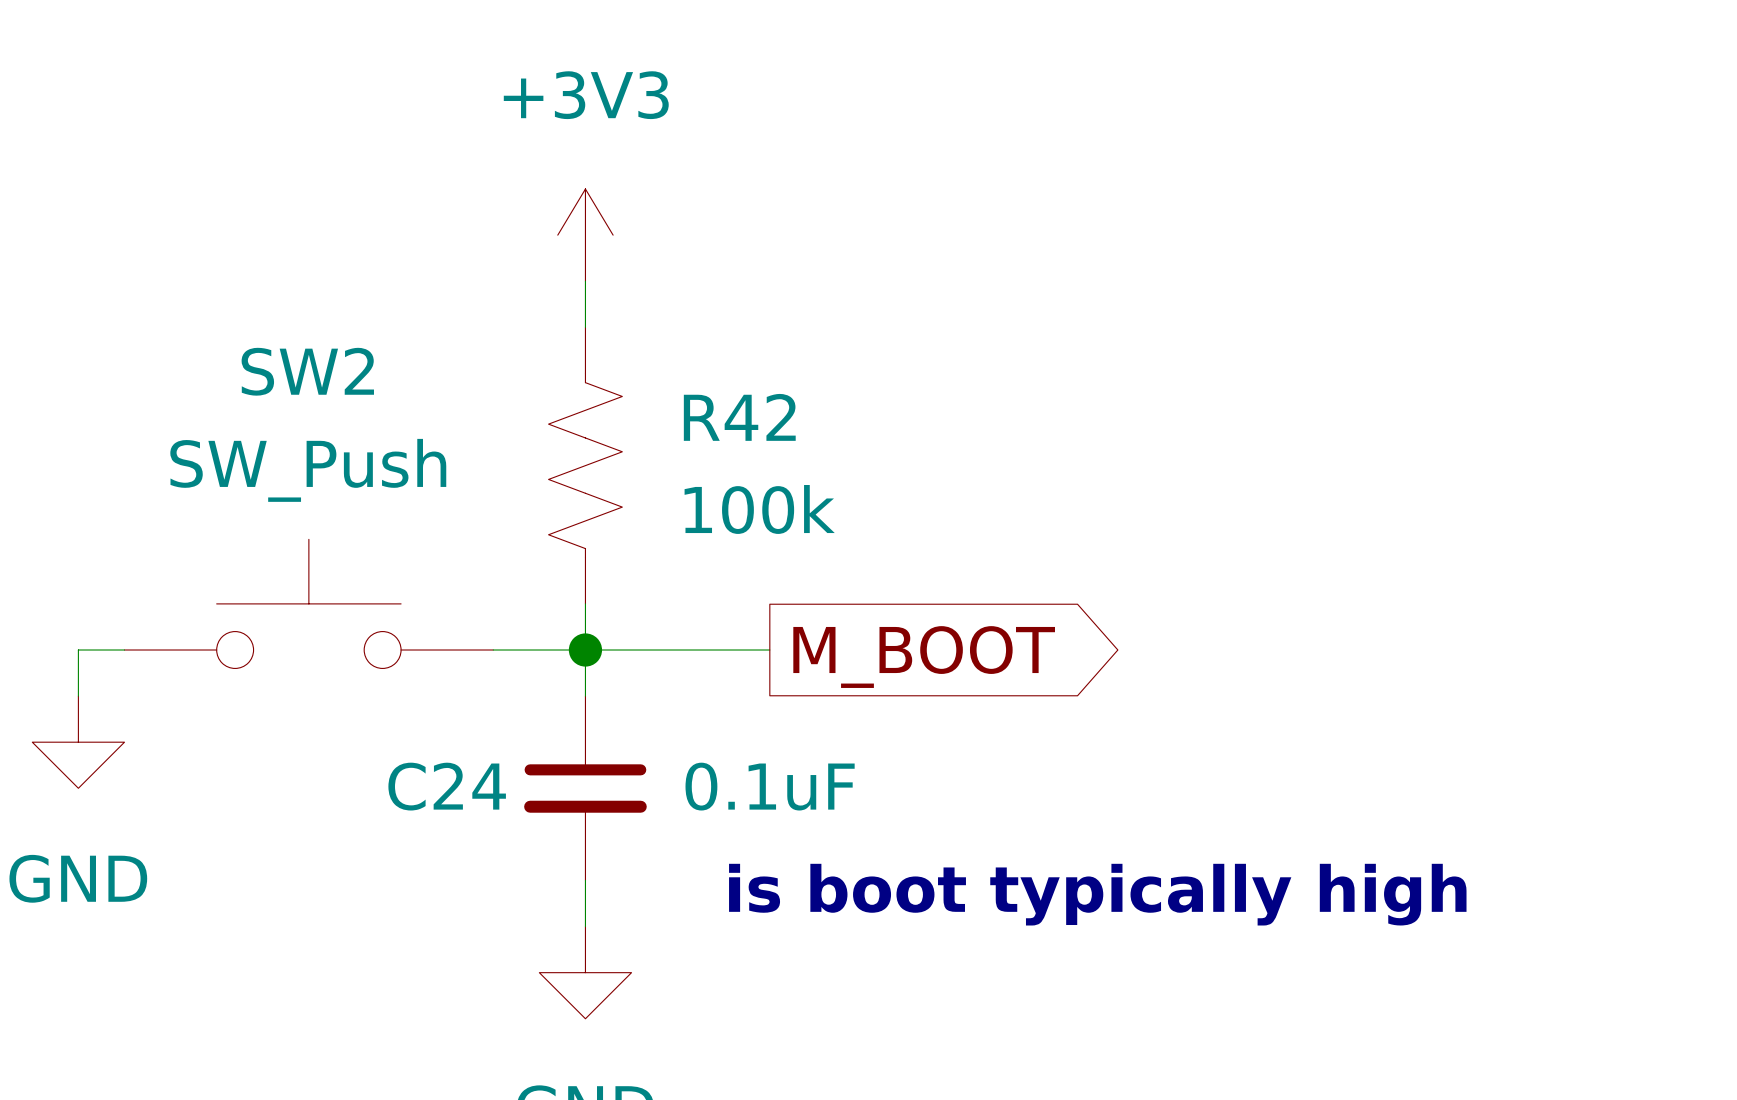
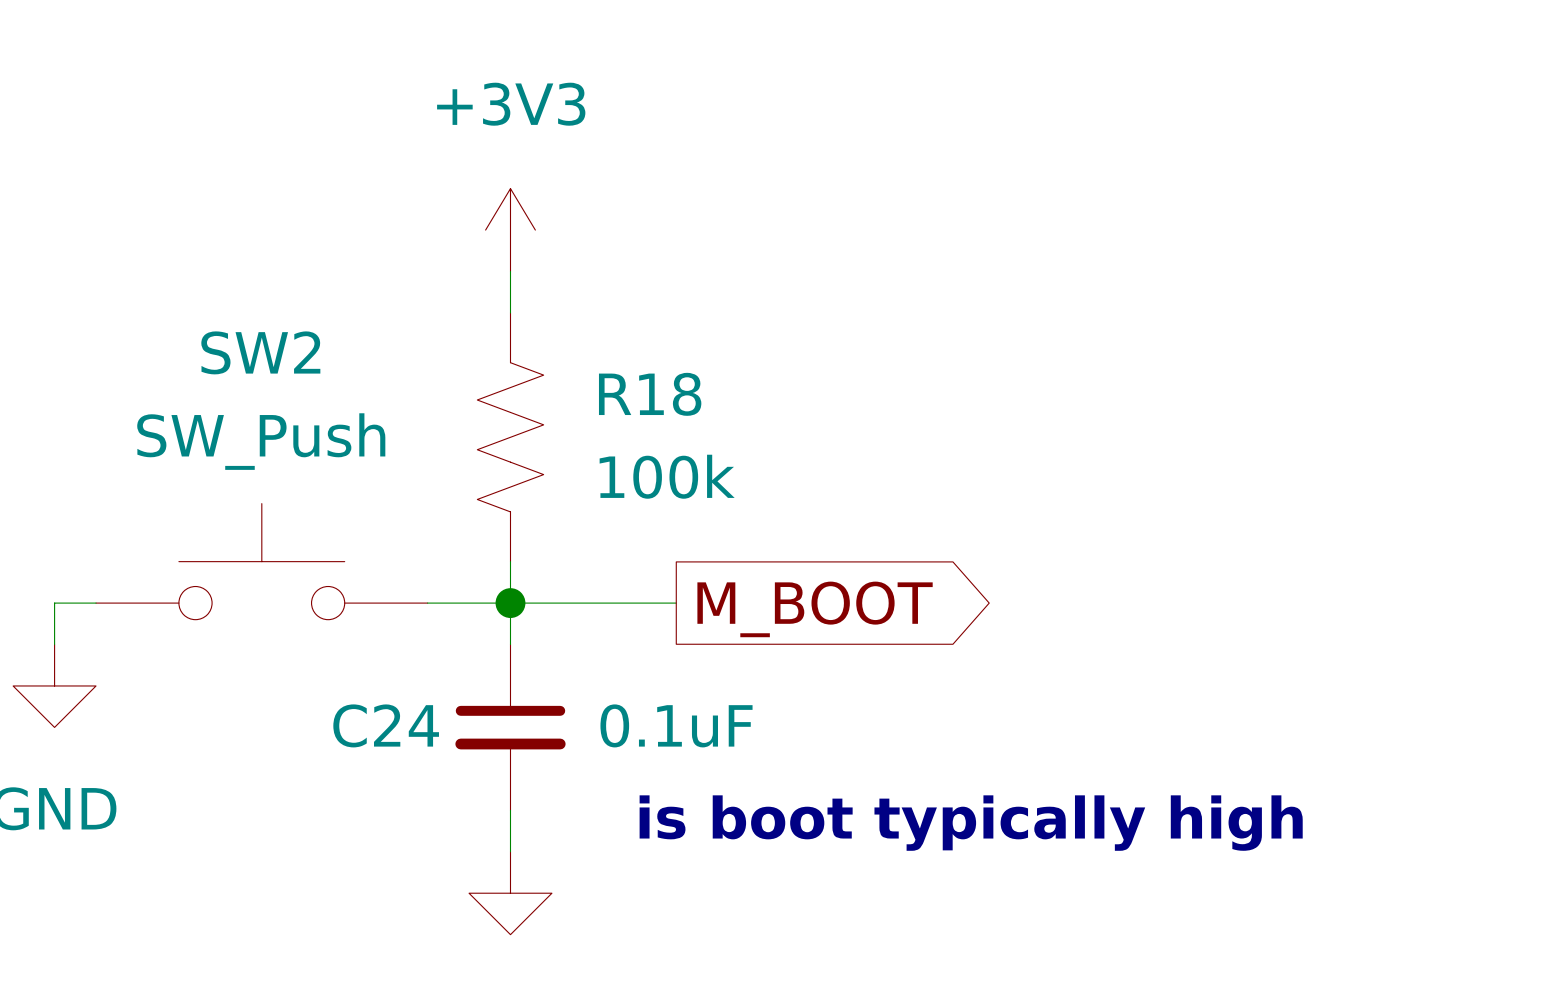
R42 name: R42 (739, 417) -> R18 (650, 394)

